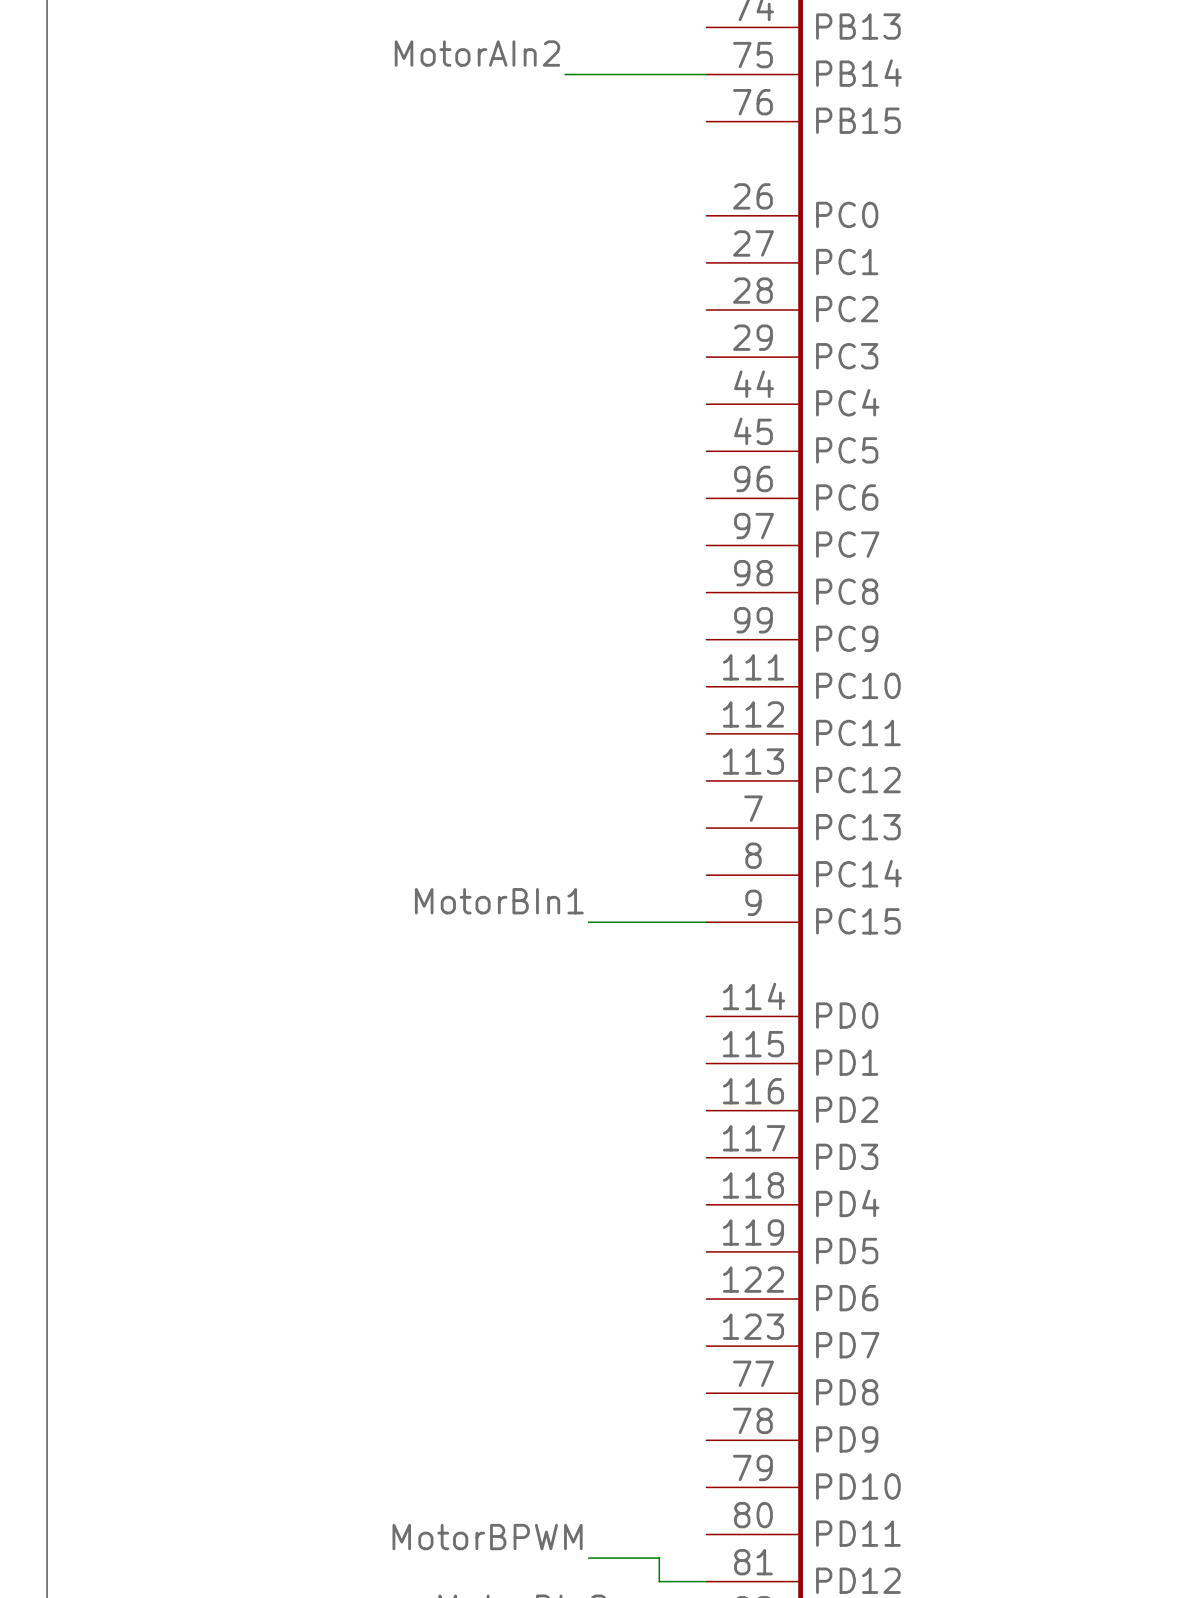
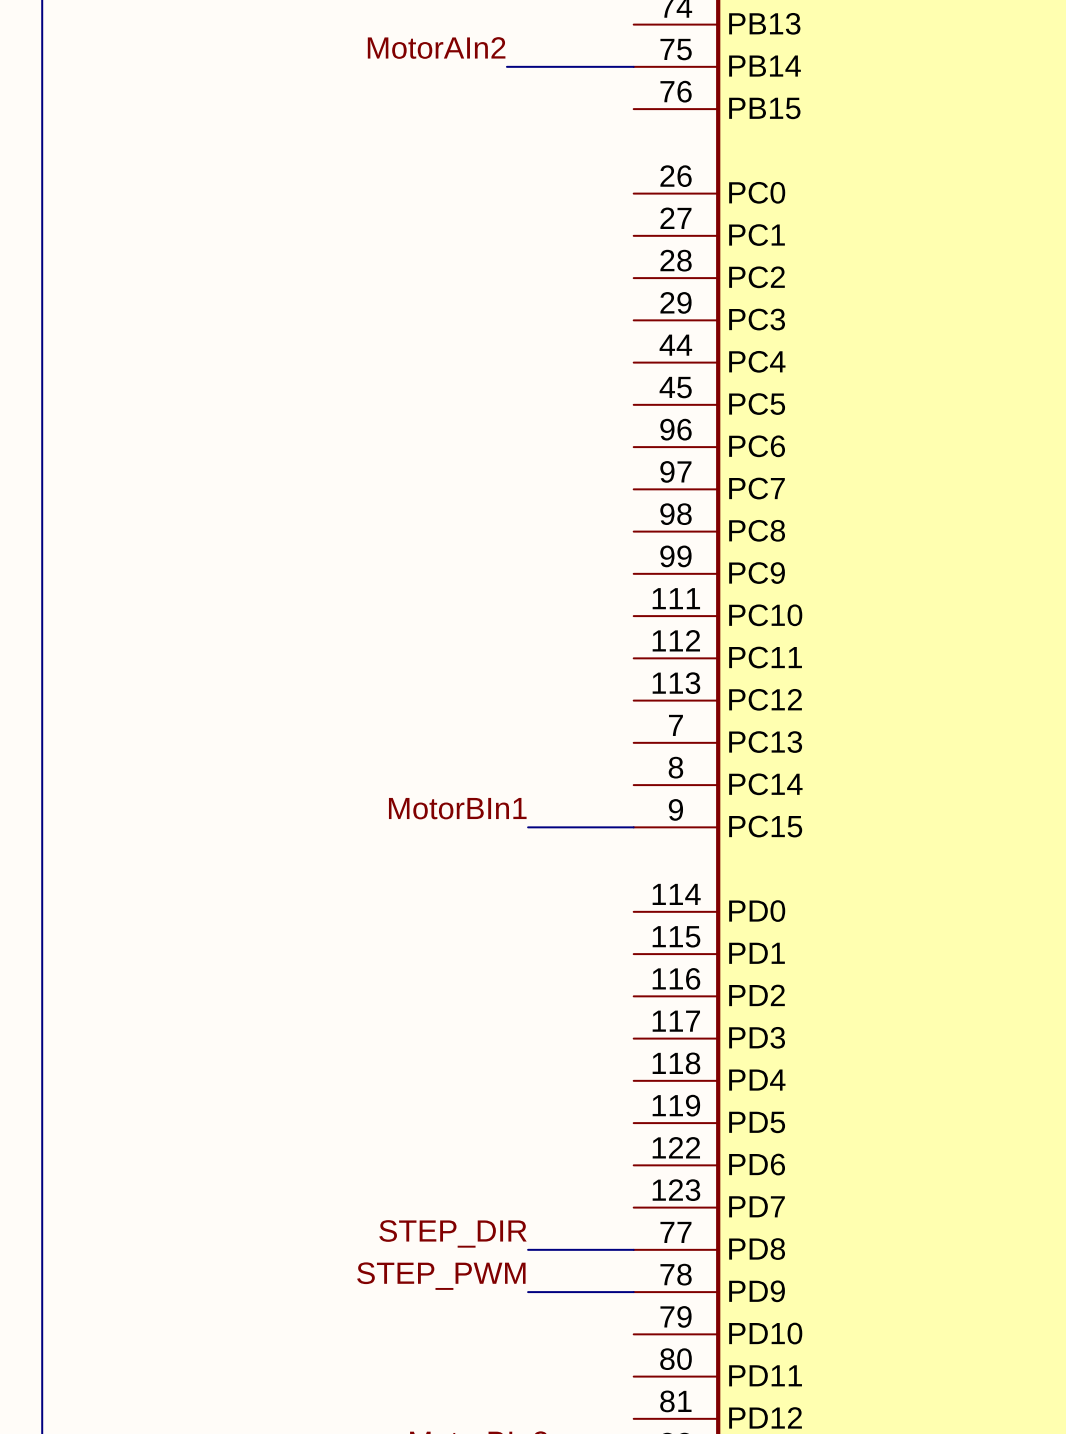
label: none -> STEP_DIR (452, 1233)
wire: none -> (528, 1249) (633, 1249)
label: none -> STEP_PWM (441, 1276)
wire: none -> (528, 1292) (633, 1292)
label: MotorBPWM (487, 1537) -> none
wire: (588, 1558) (659, 1558) (659, 1581) (706, 1581) -> none

